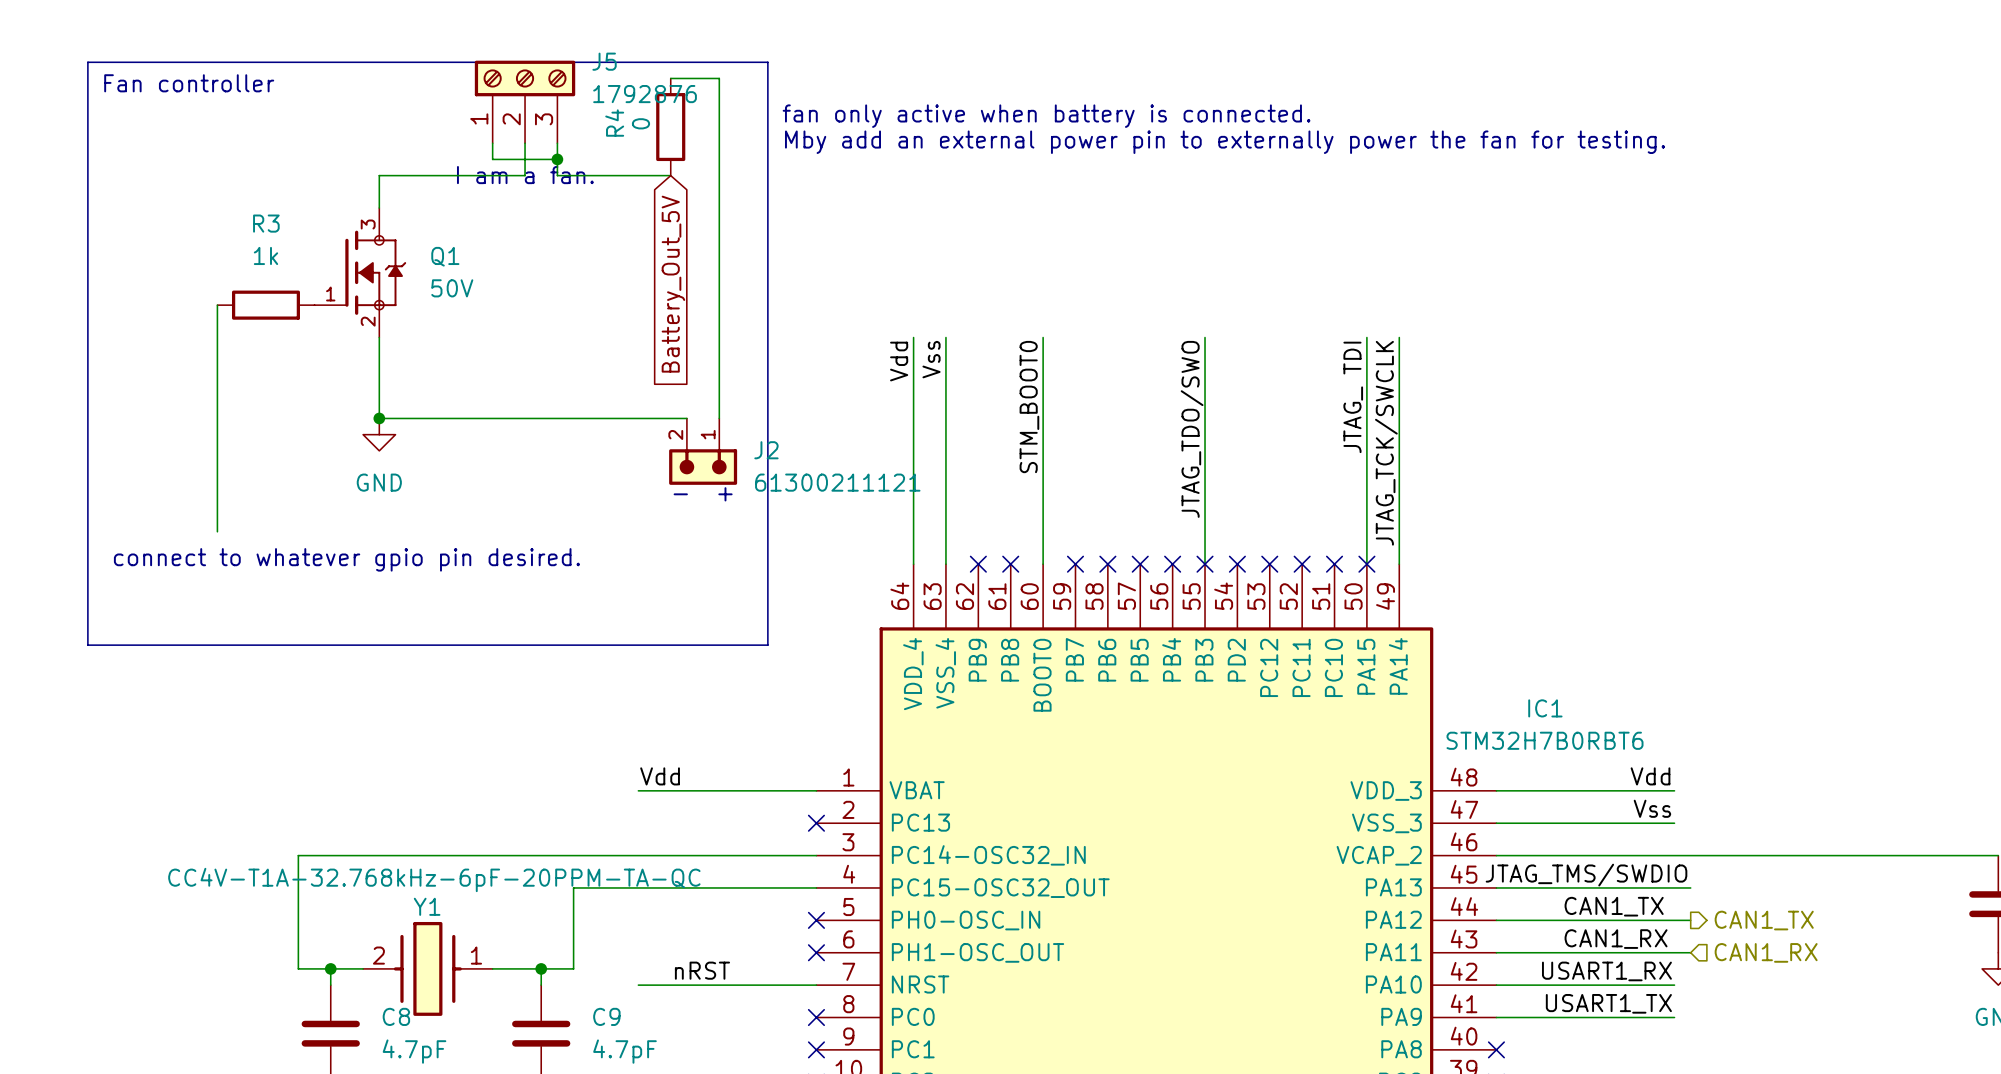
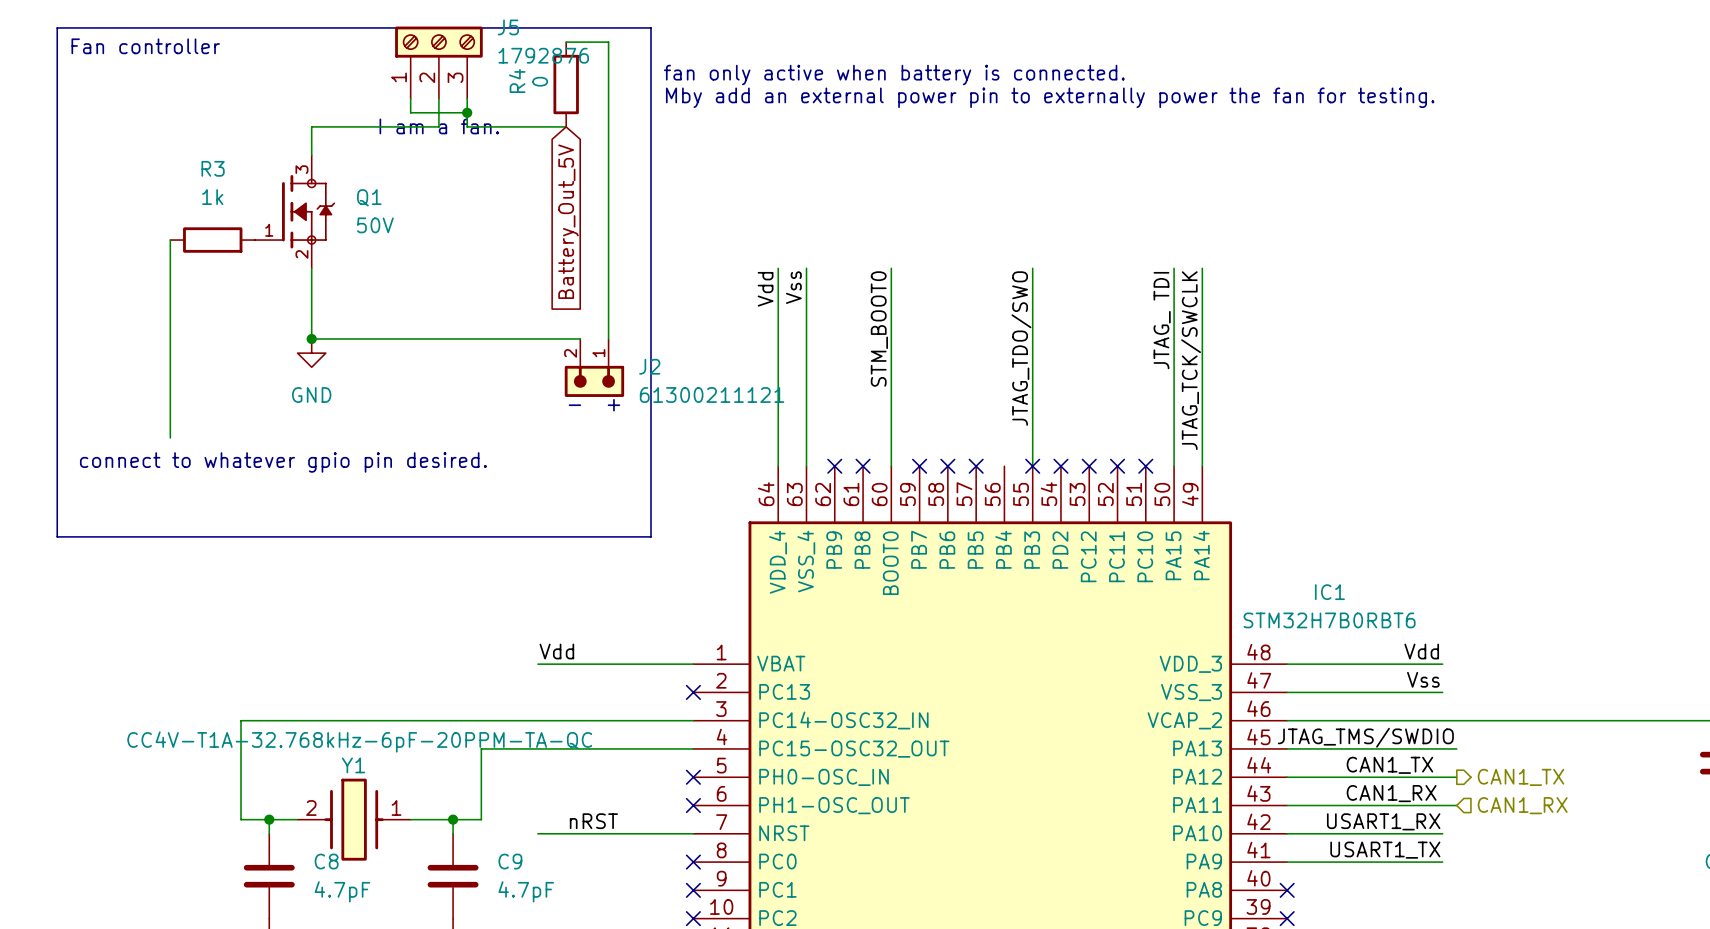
no-connect mark: (1172, 564) -> none
no-connect mark: (1366, 564) -> none

